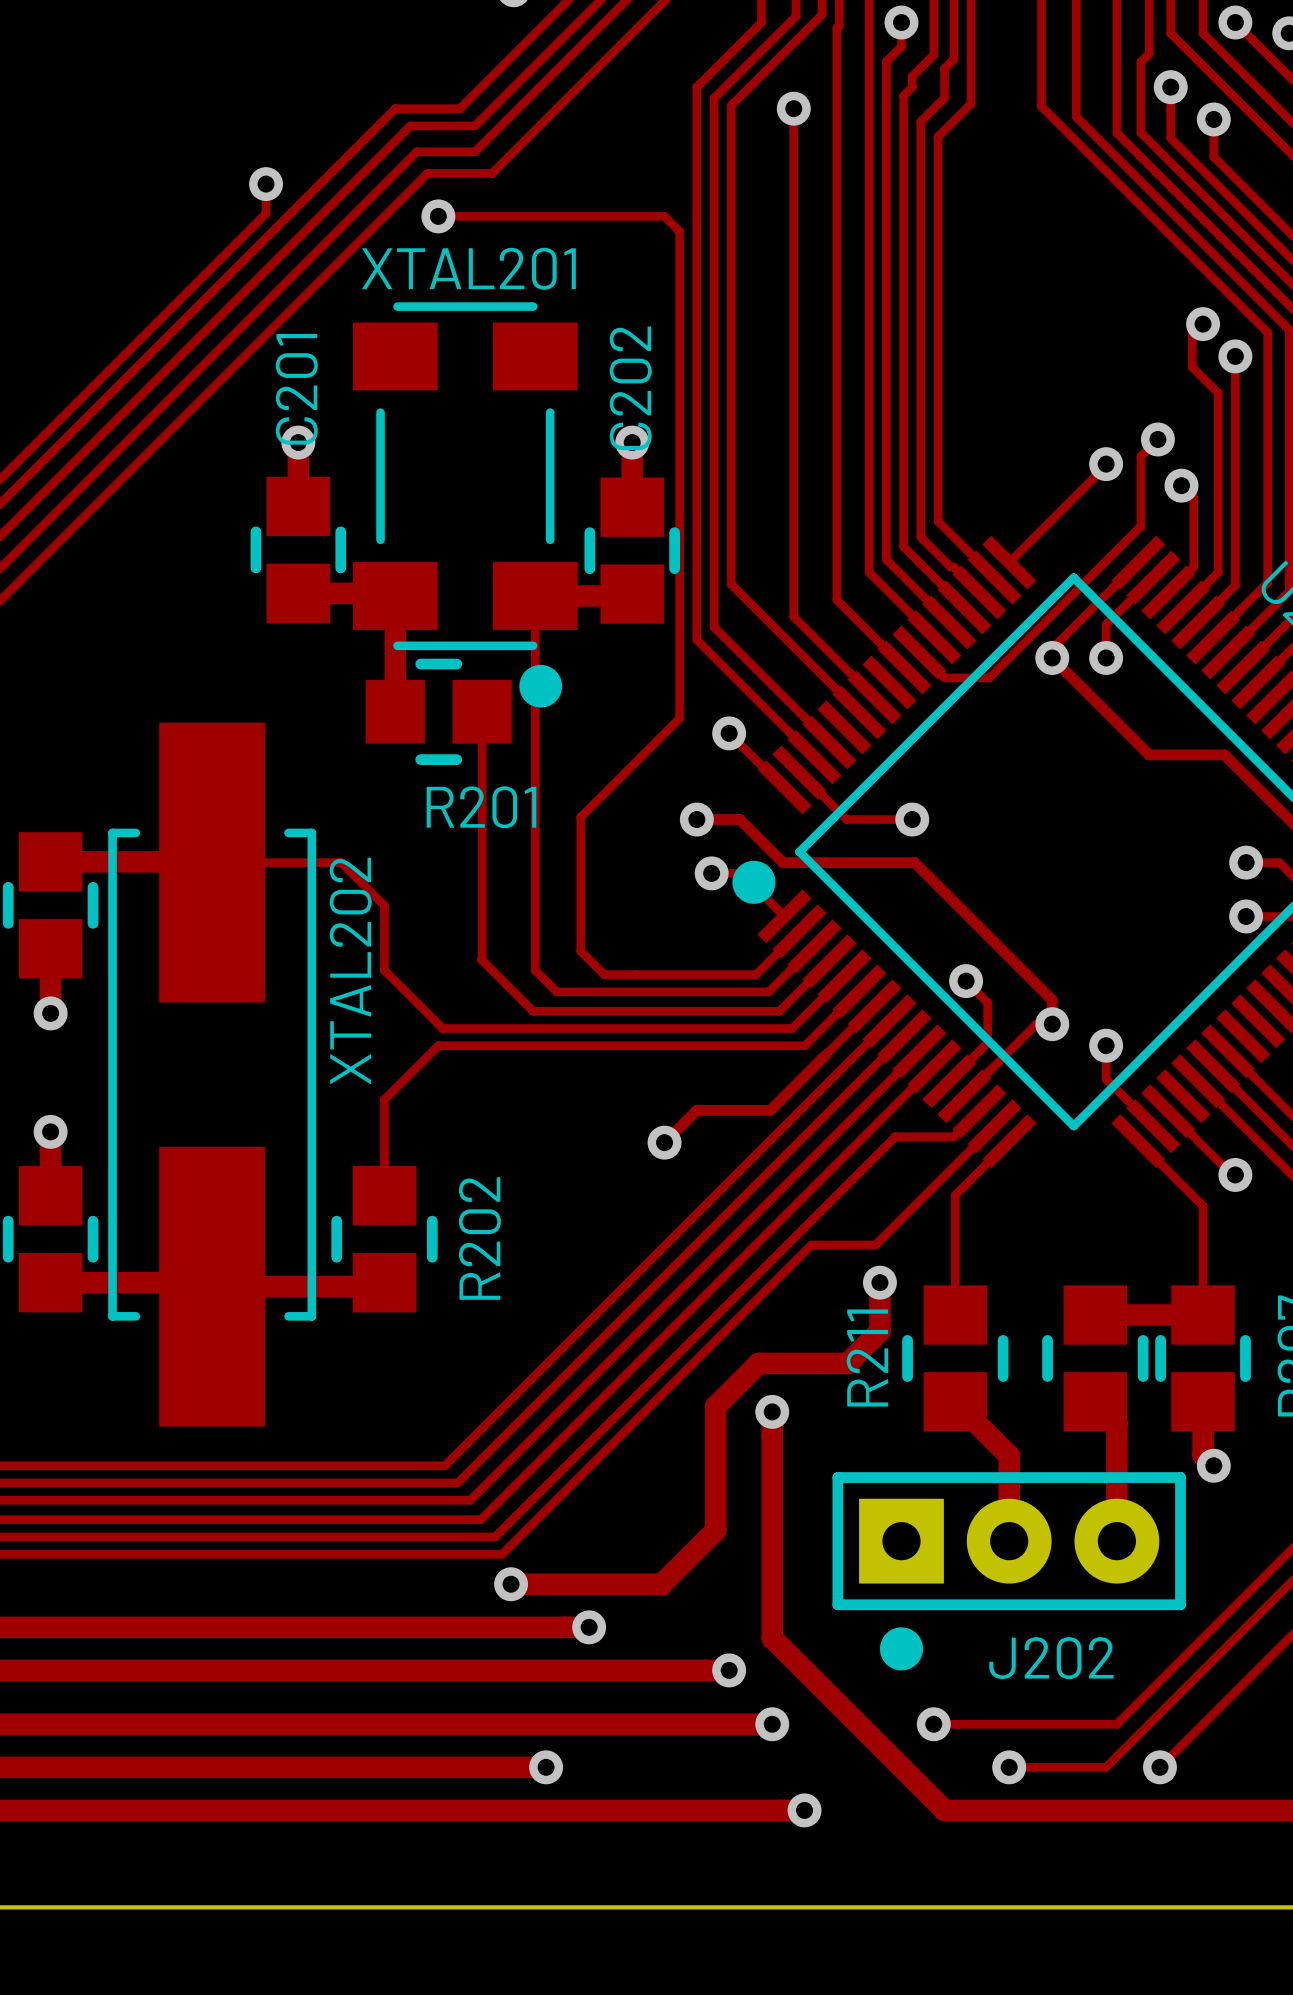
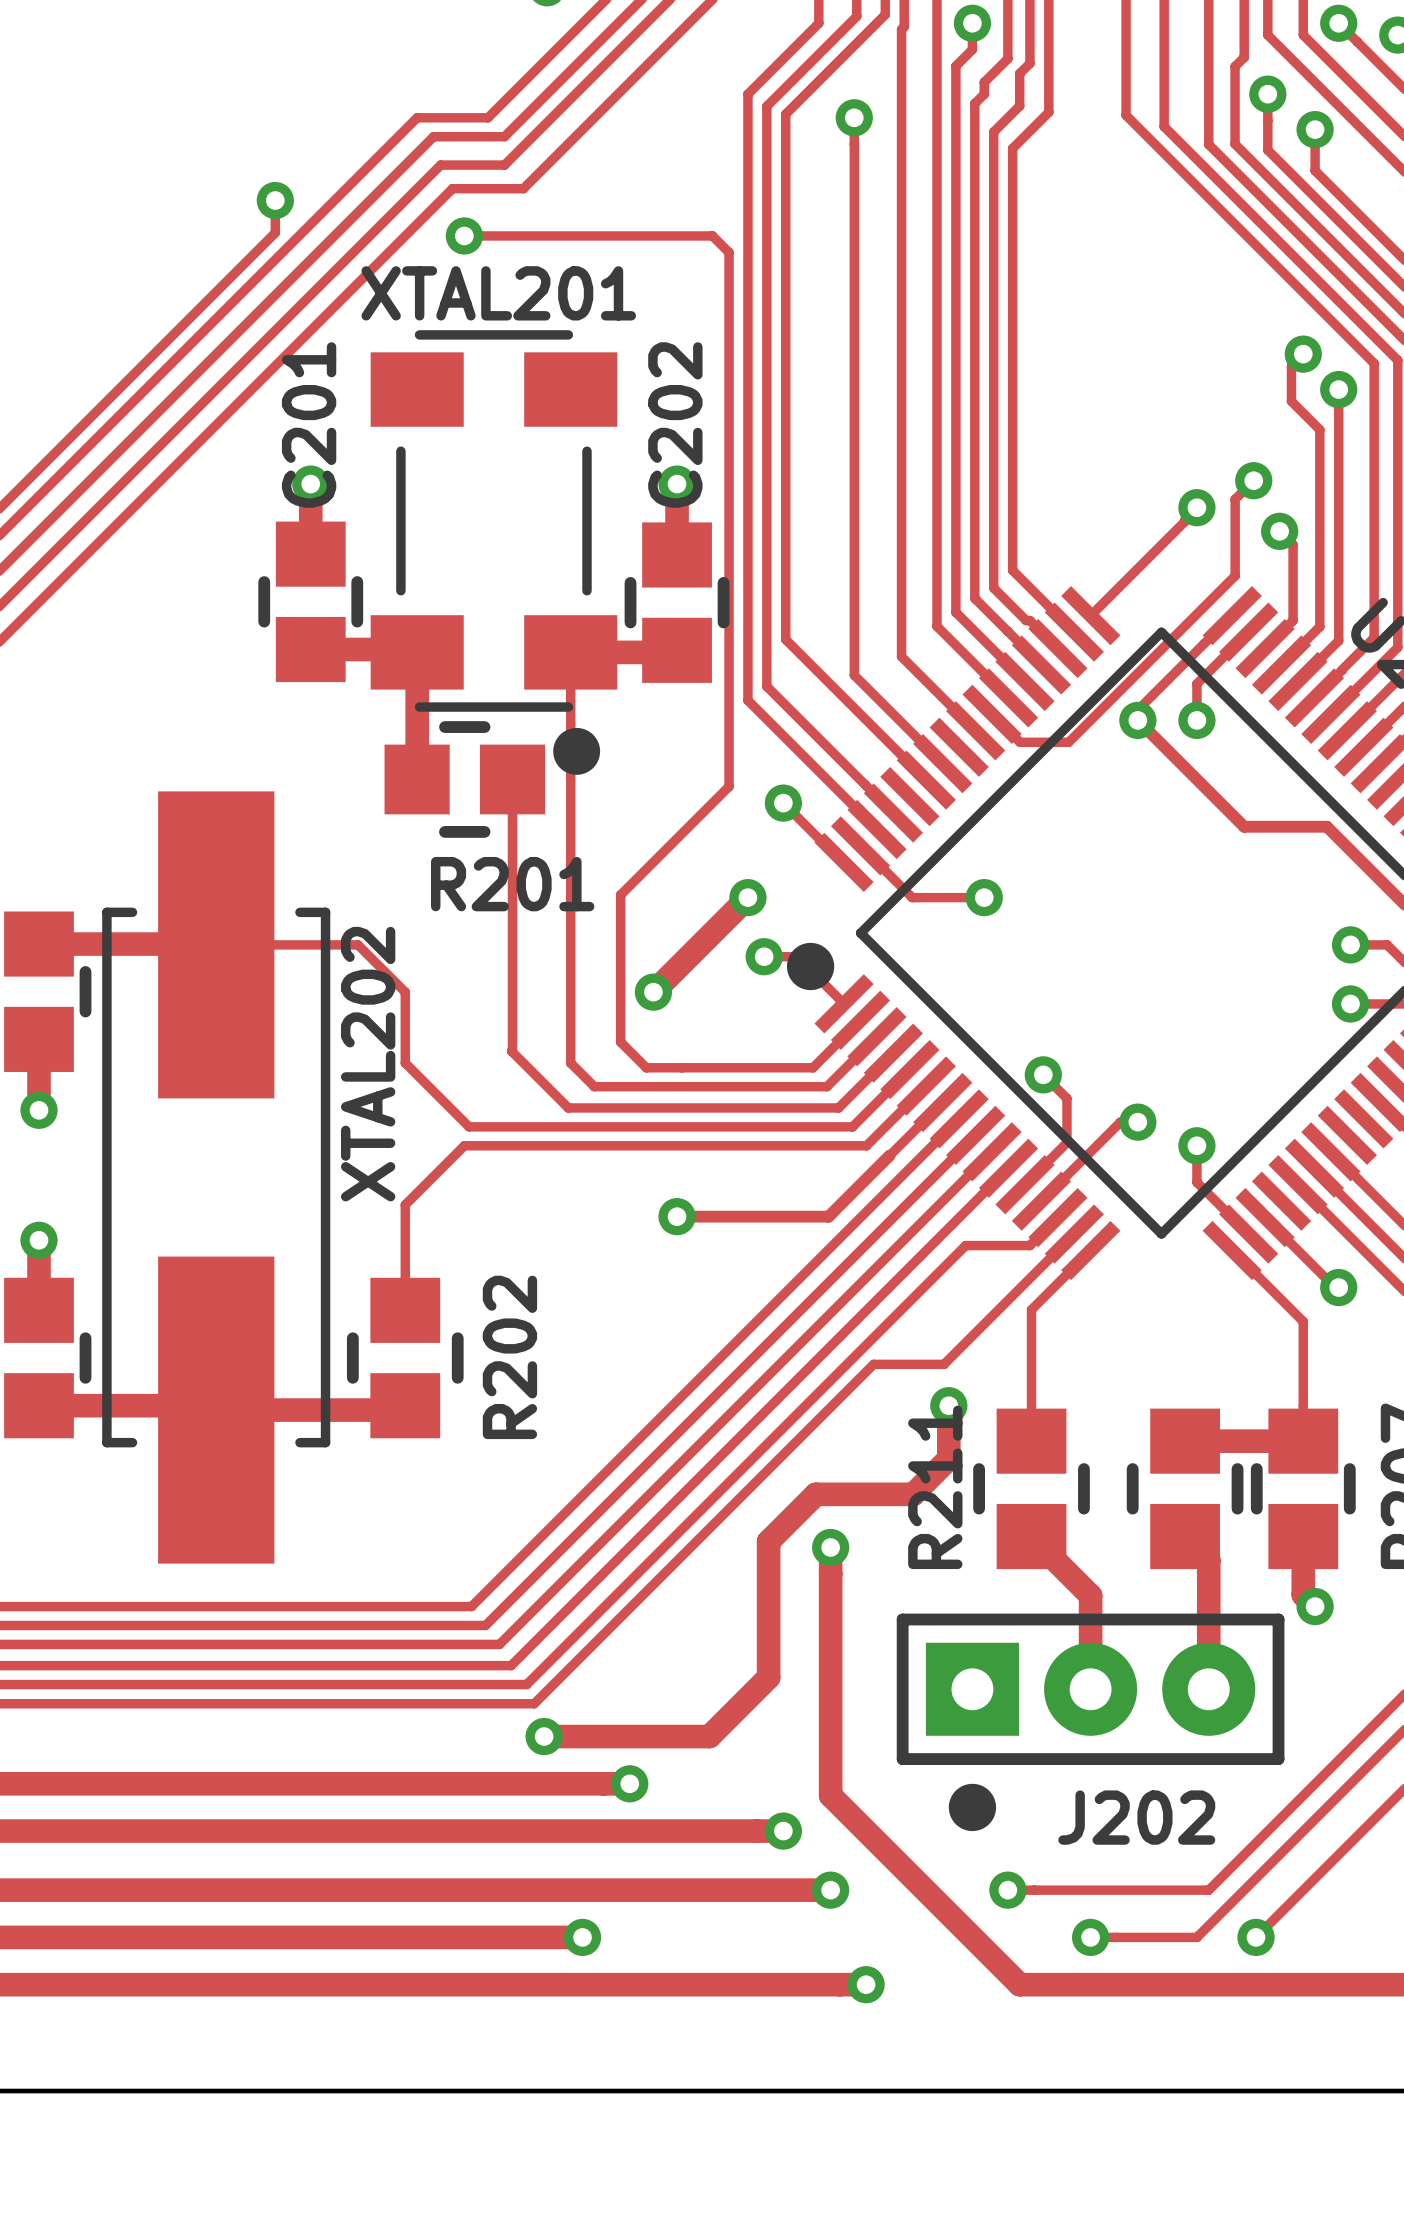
track: (696, 819) (739, 819) (783, 862) (914, 862) (1052, 1000) (1052, 1024) -> (747, 897) (653, 992)
via: none -> (653, 992)
track: (696, 1110) (664, 1142) -> (747, 1216) (677, 1216)
via position: (664, 1142) -> (677, 1216)

